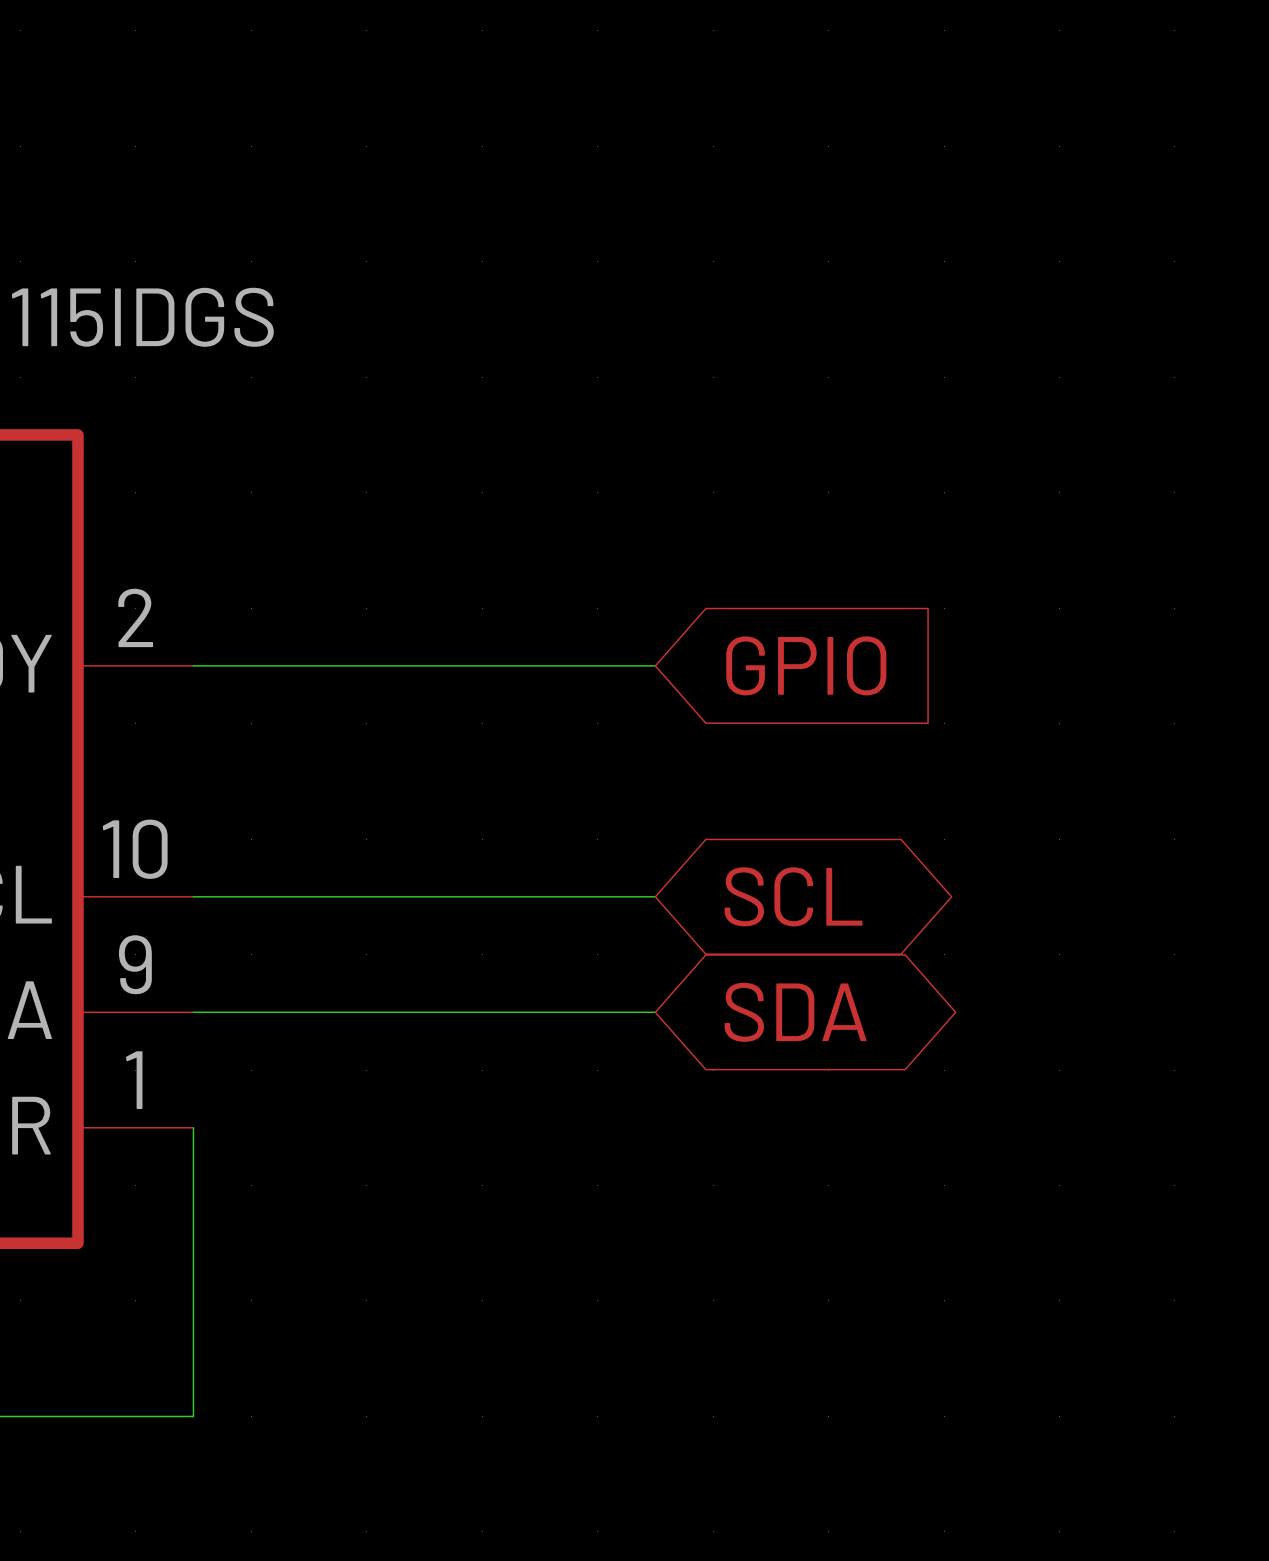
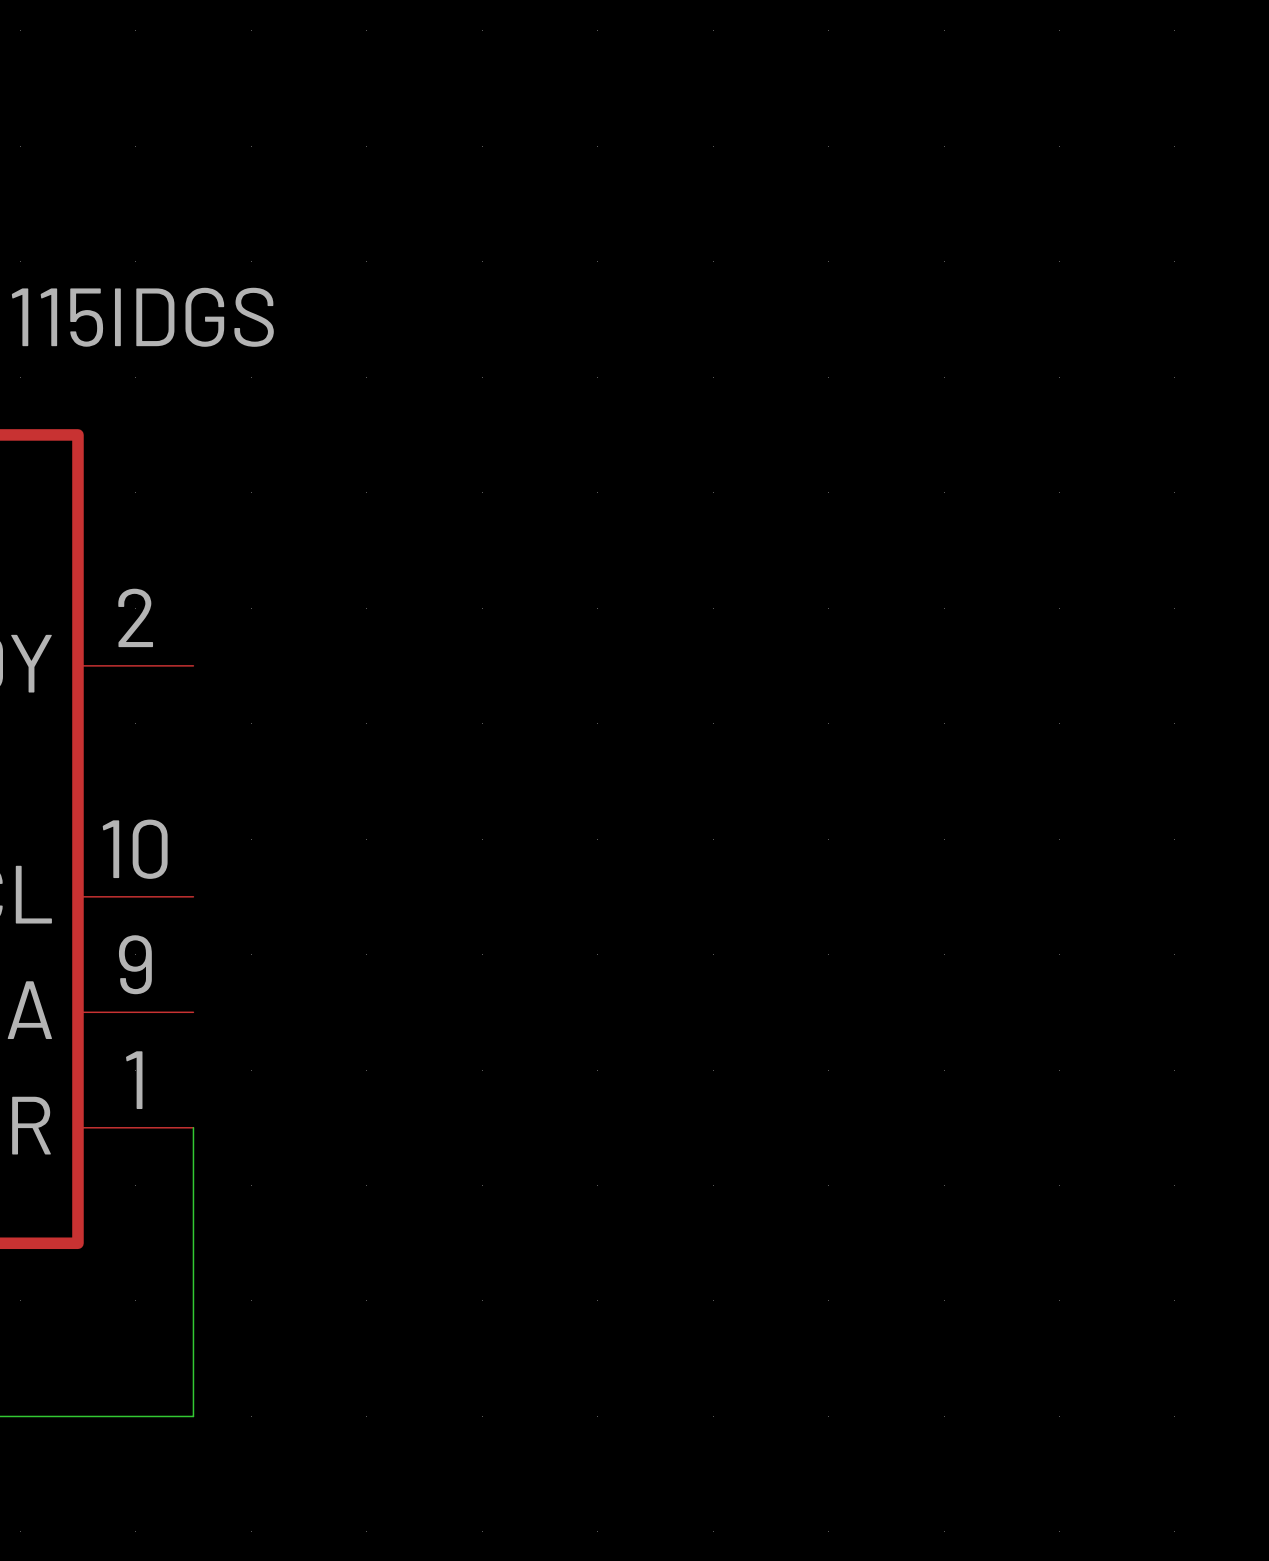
wire: (193, 665) (655, 665) -> none
global label: GPIO (806, 665) -> none
wire: (193, 896) (655, 896) -> none
global label: SCL (793, 896) -> none
wire: (193, 1012) (655, 1012) -> none
global label: SDA (795, 1012) -> none

